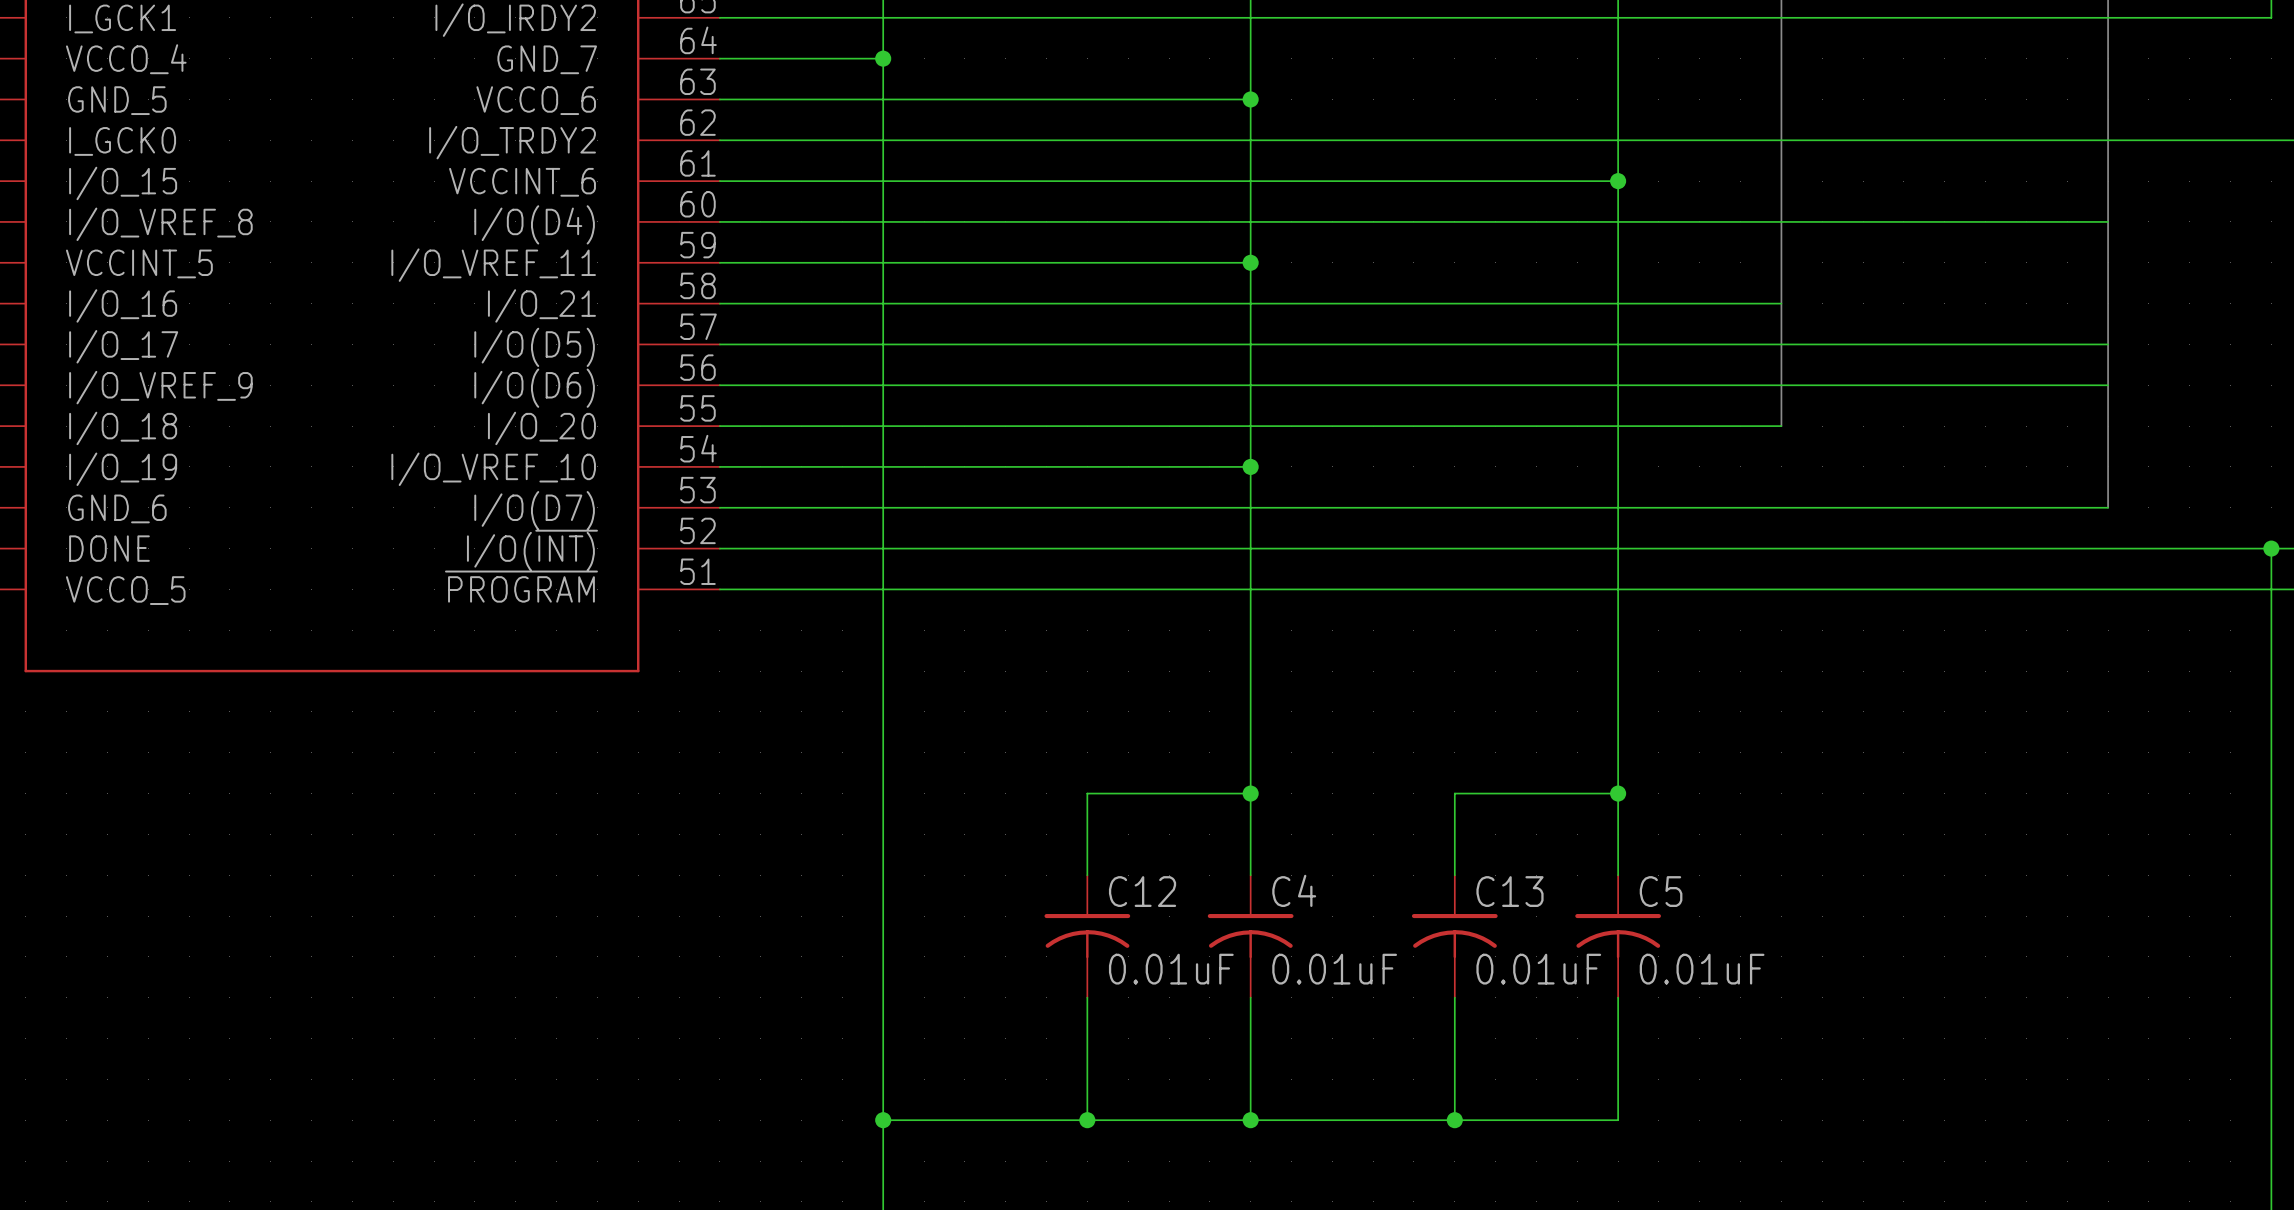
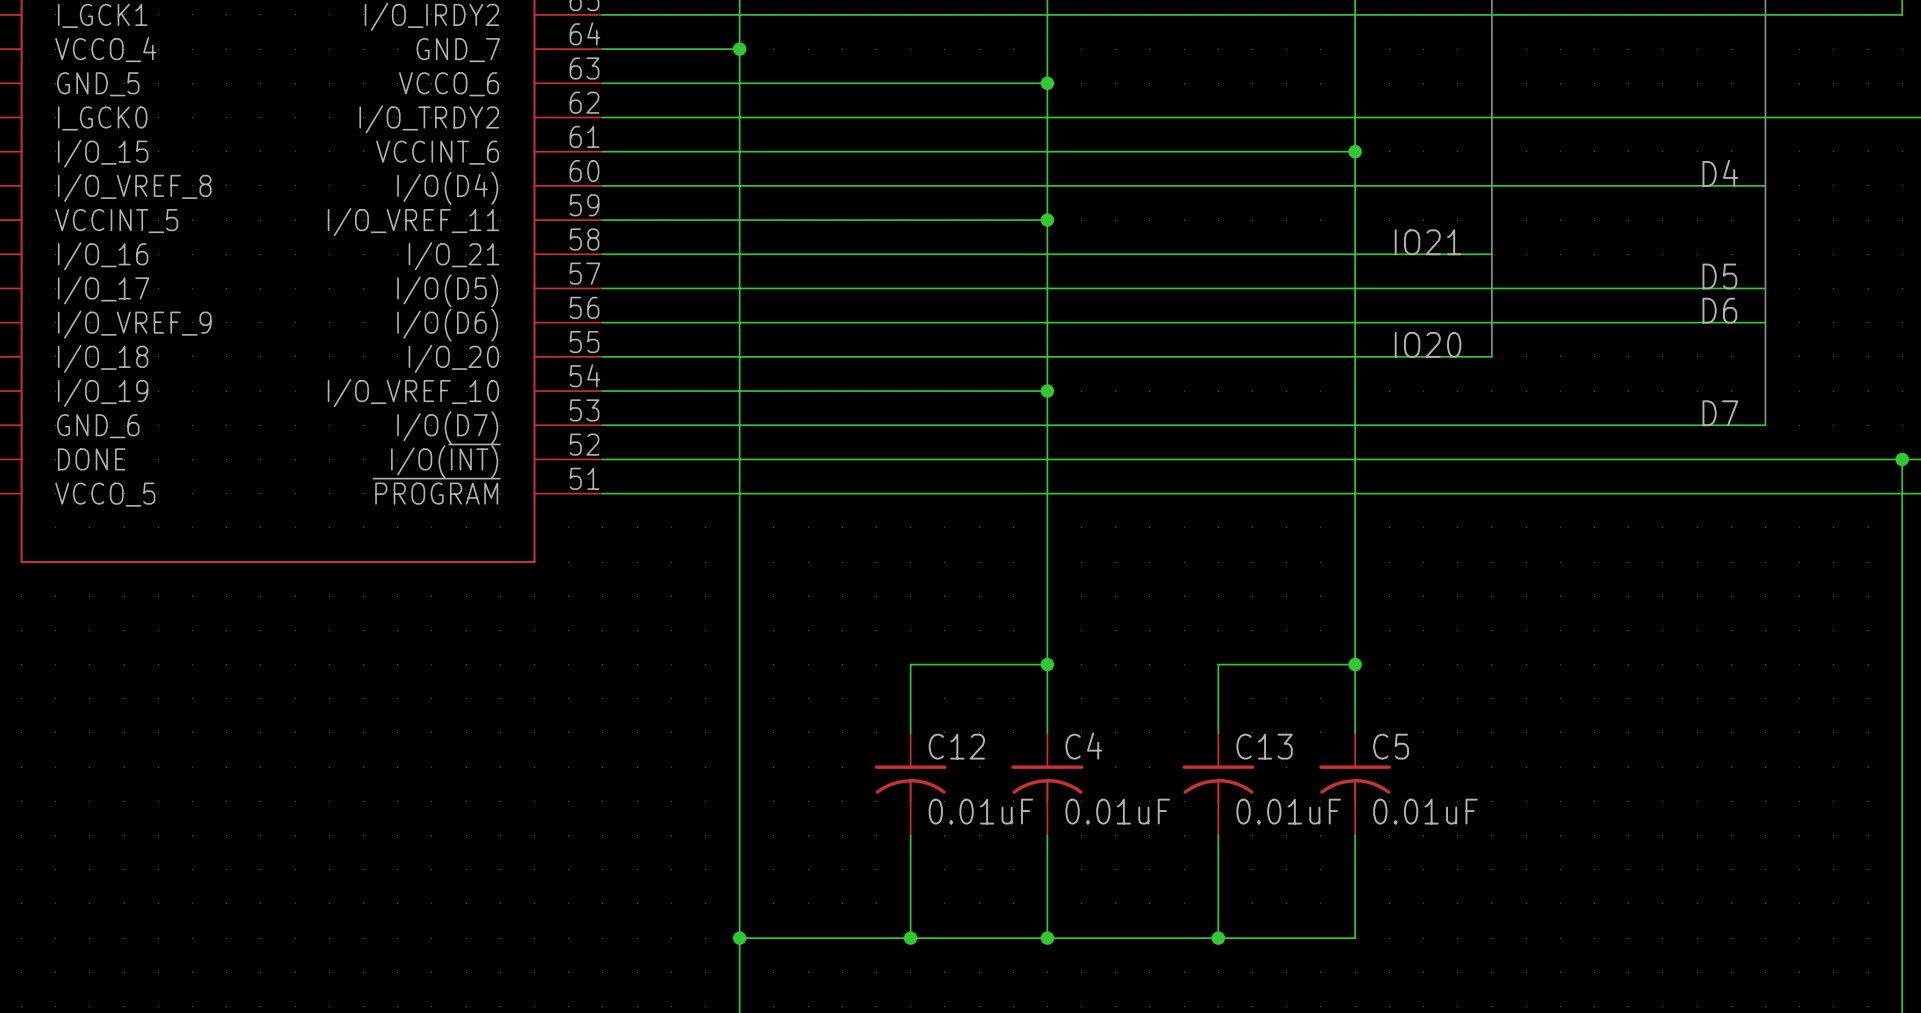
label: none -> D4 (1720, 173)
label: none -> IO21 (1428, 242)
label: none -> D5 (1719, 276)
label: none -> D6 (1719, 310)
label: none -> IO20 (1428, 344)
label: none -> D7 (1720, 413)

